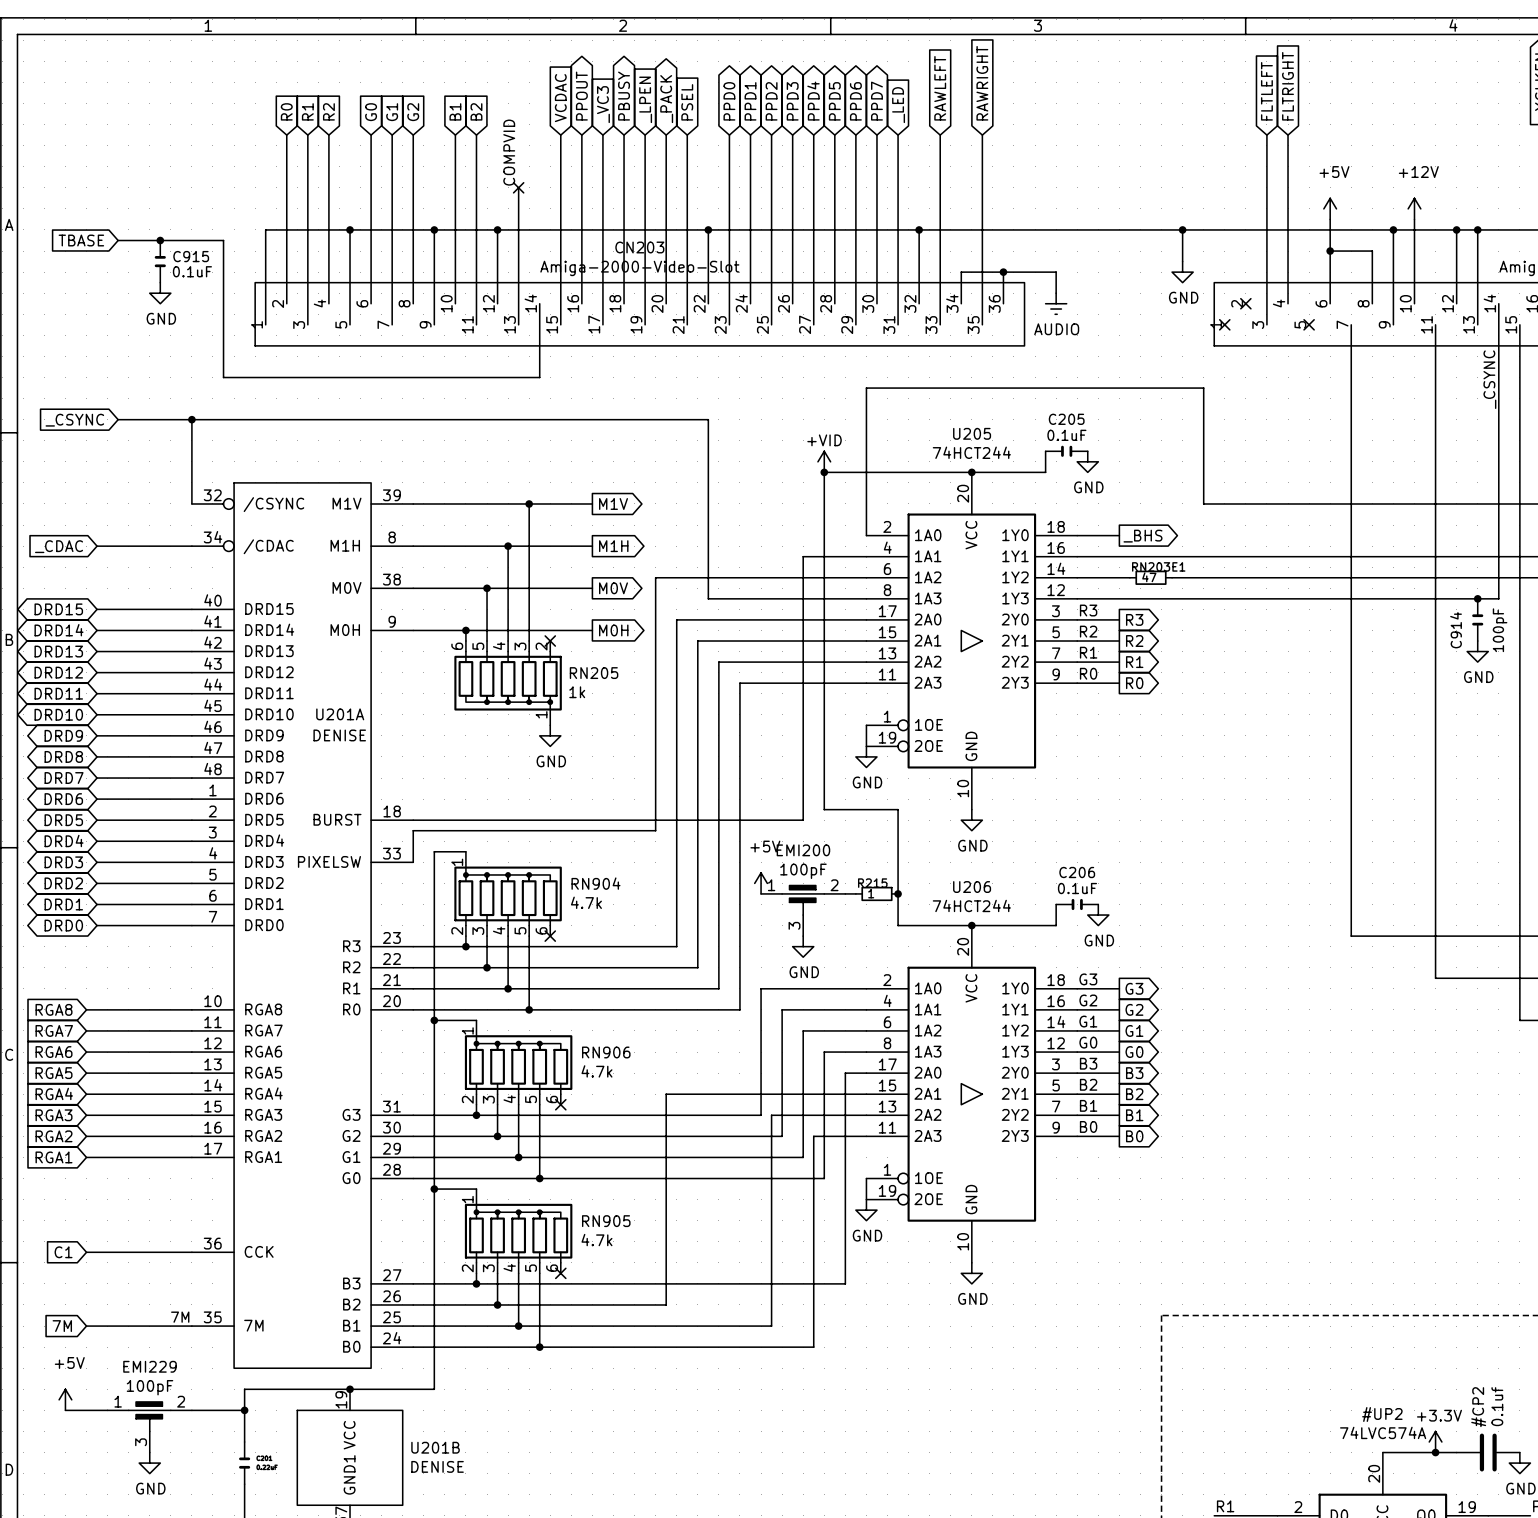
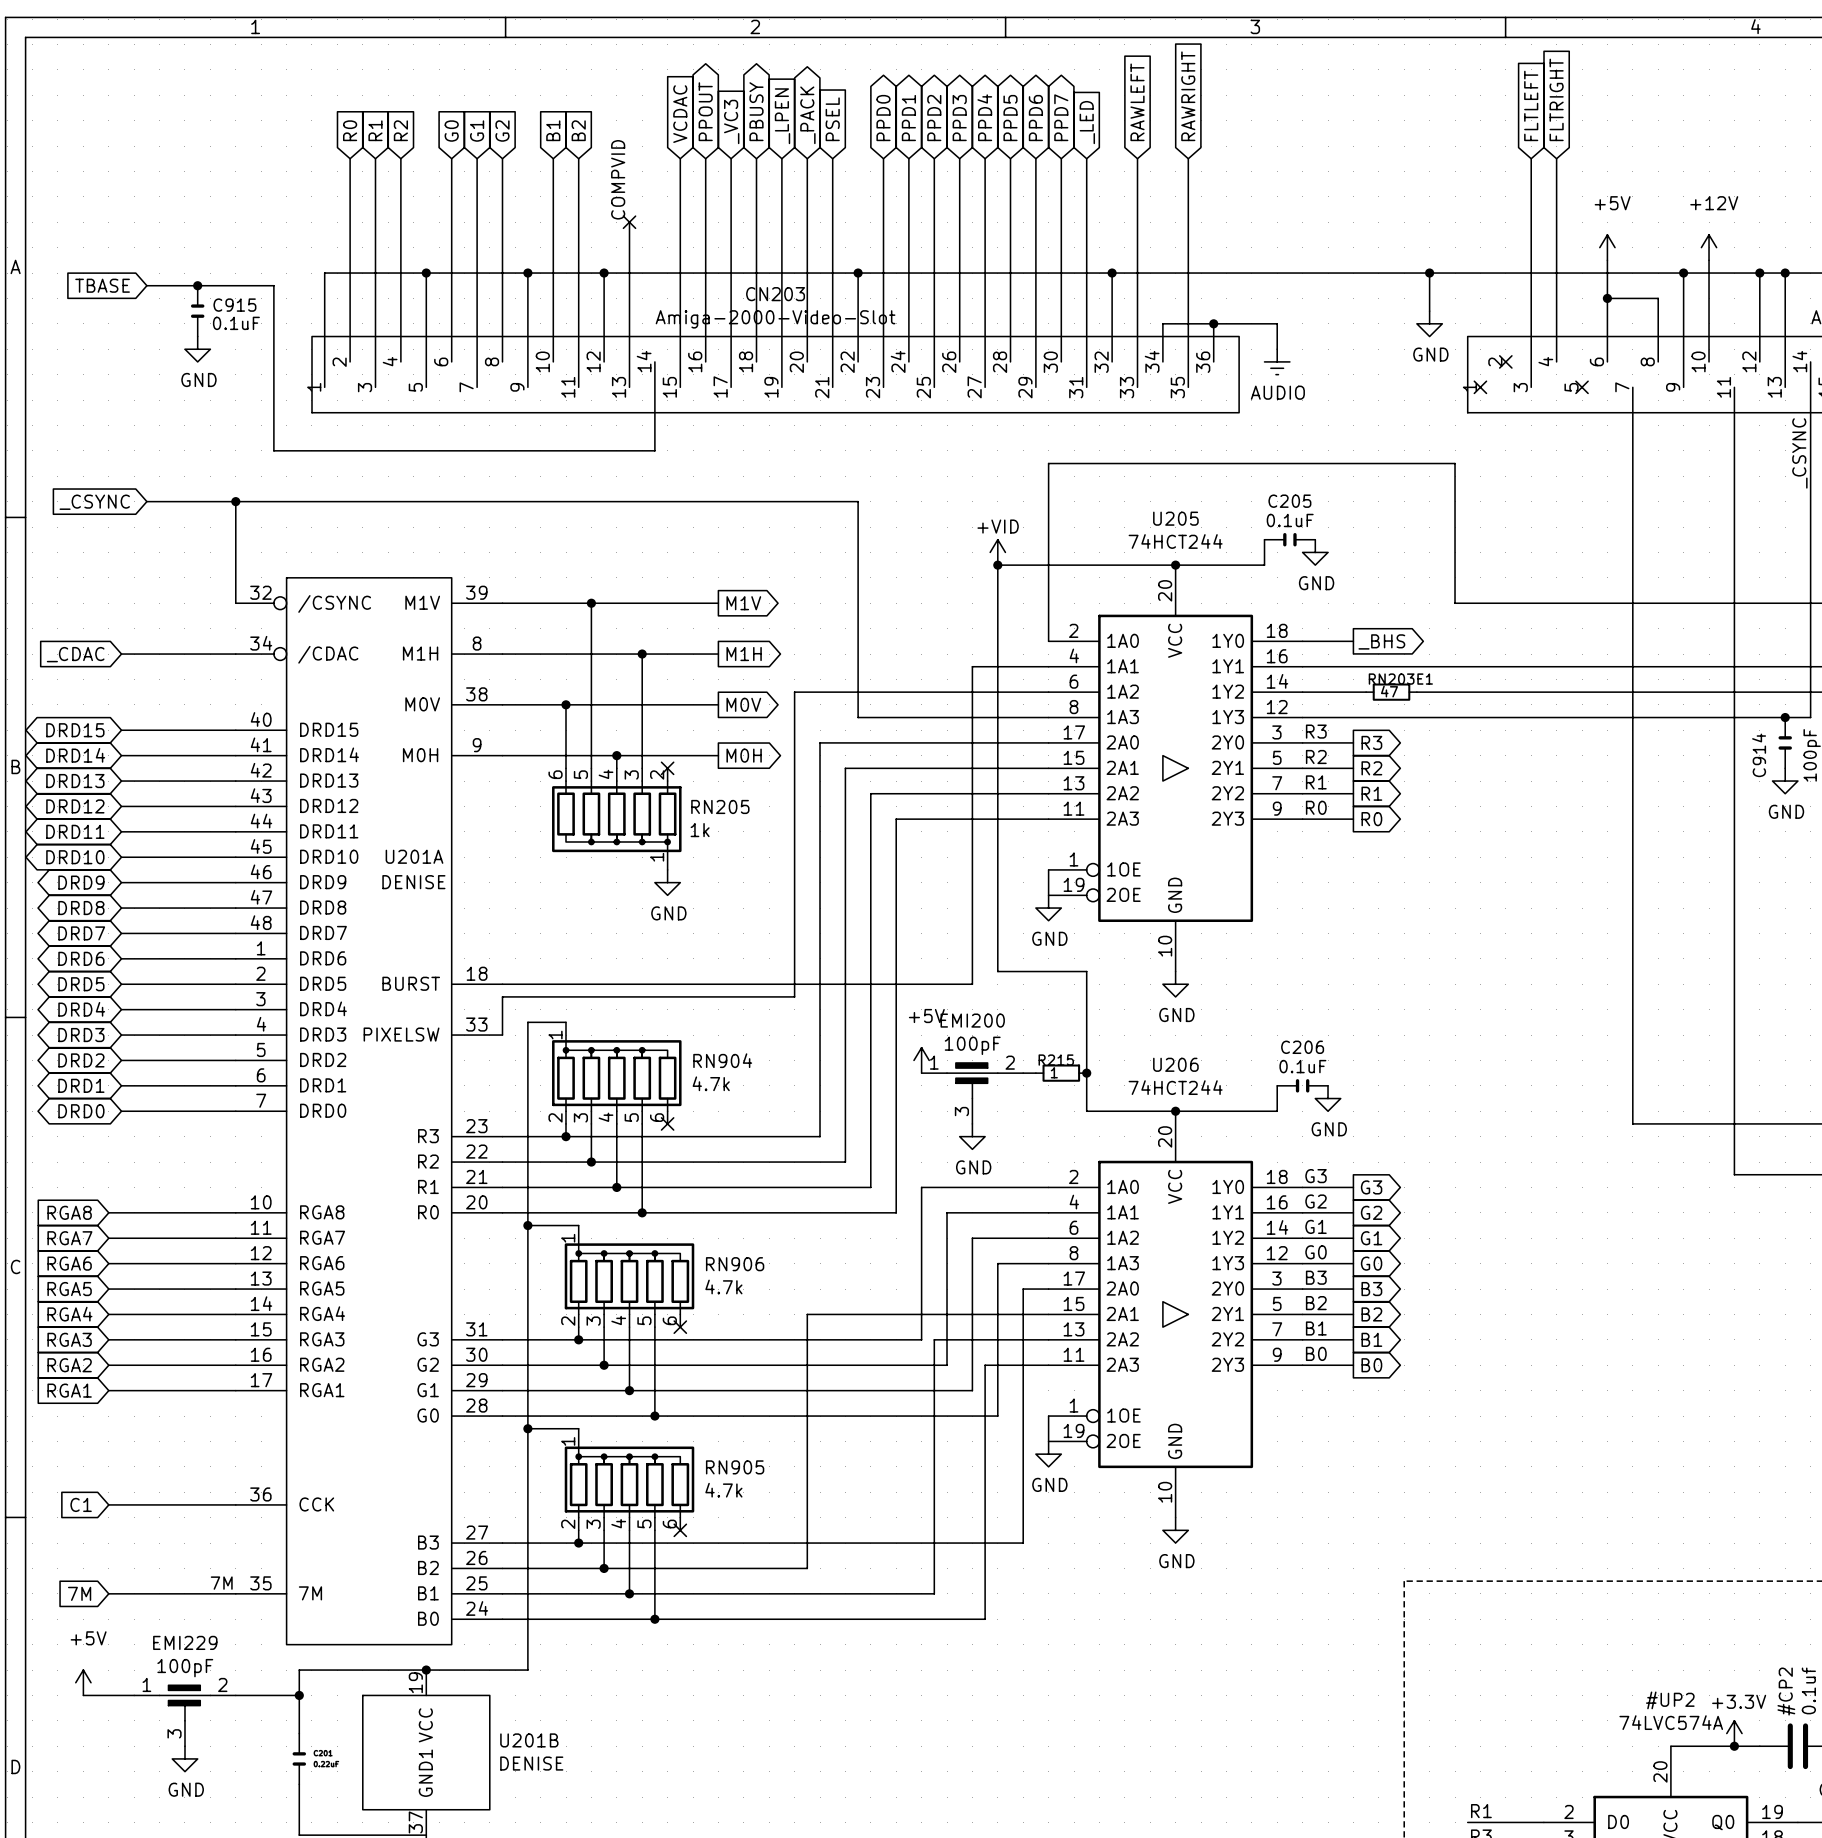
junction: none -> (591, 603)
wire: (529, 503) (529, 546) -> (566, 704) (566, 755)
junction: (529, 503) -> none
wire: (508, 546) (508, 630) -> (591, 603) (591, 704)
junction: (508, 546) -> none
junction: none -> (642, 654)
junction: none -> (566, 704)
junction: (487, 588) -> none
junction: (465, 630) -> none
junction: none -> (616, 755)

